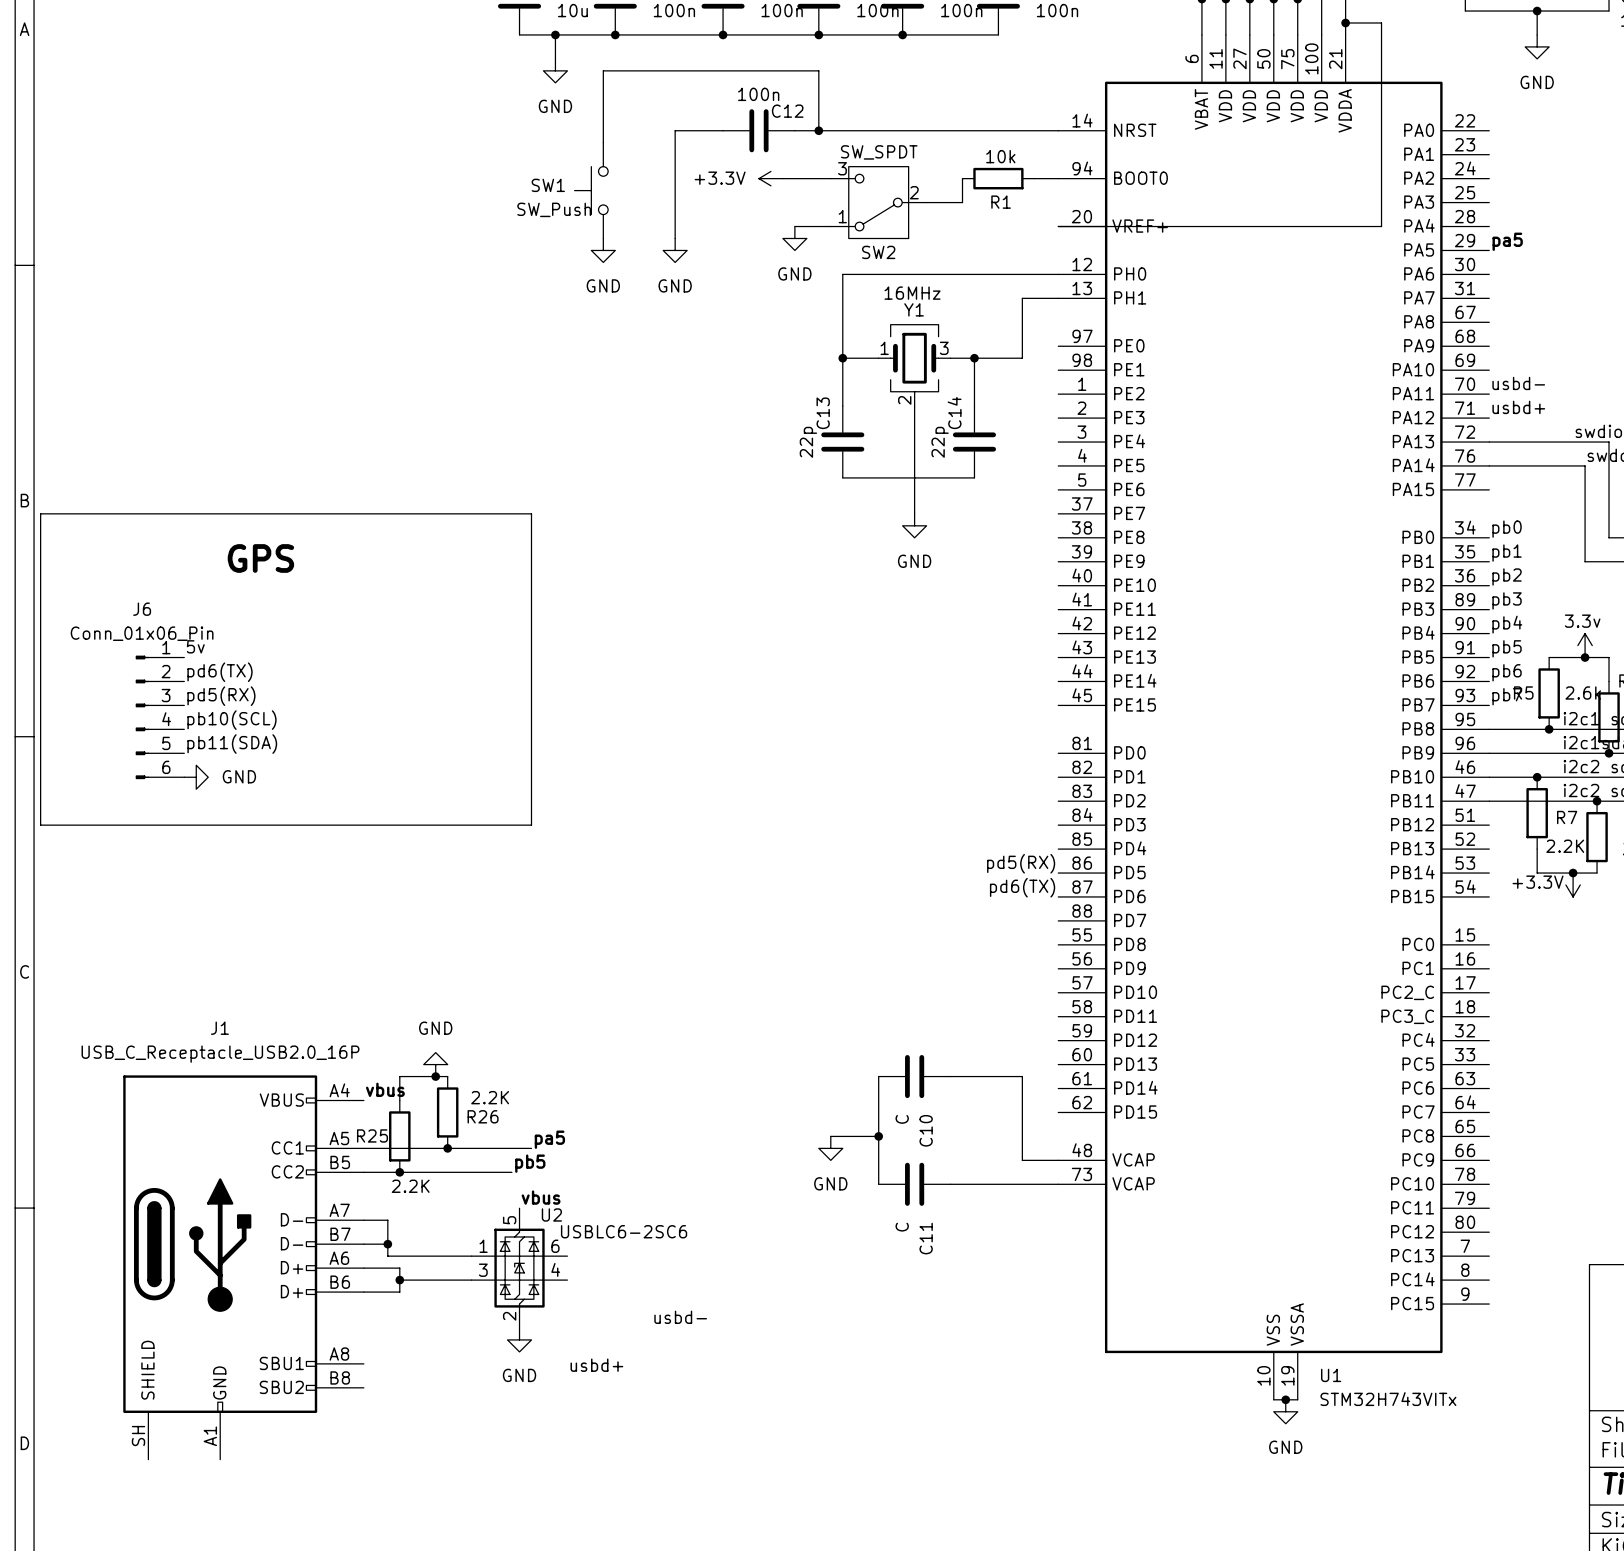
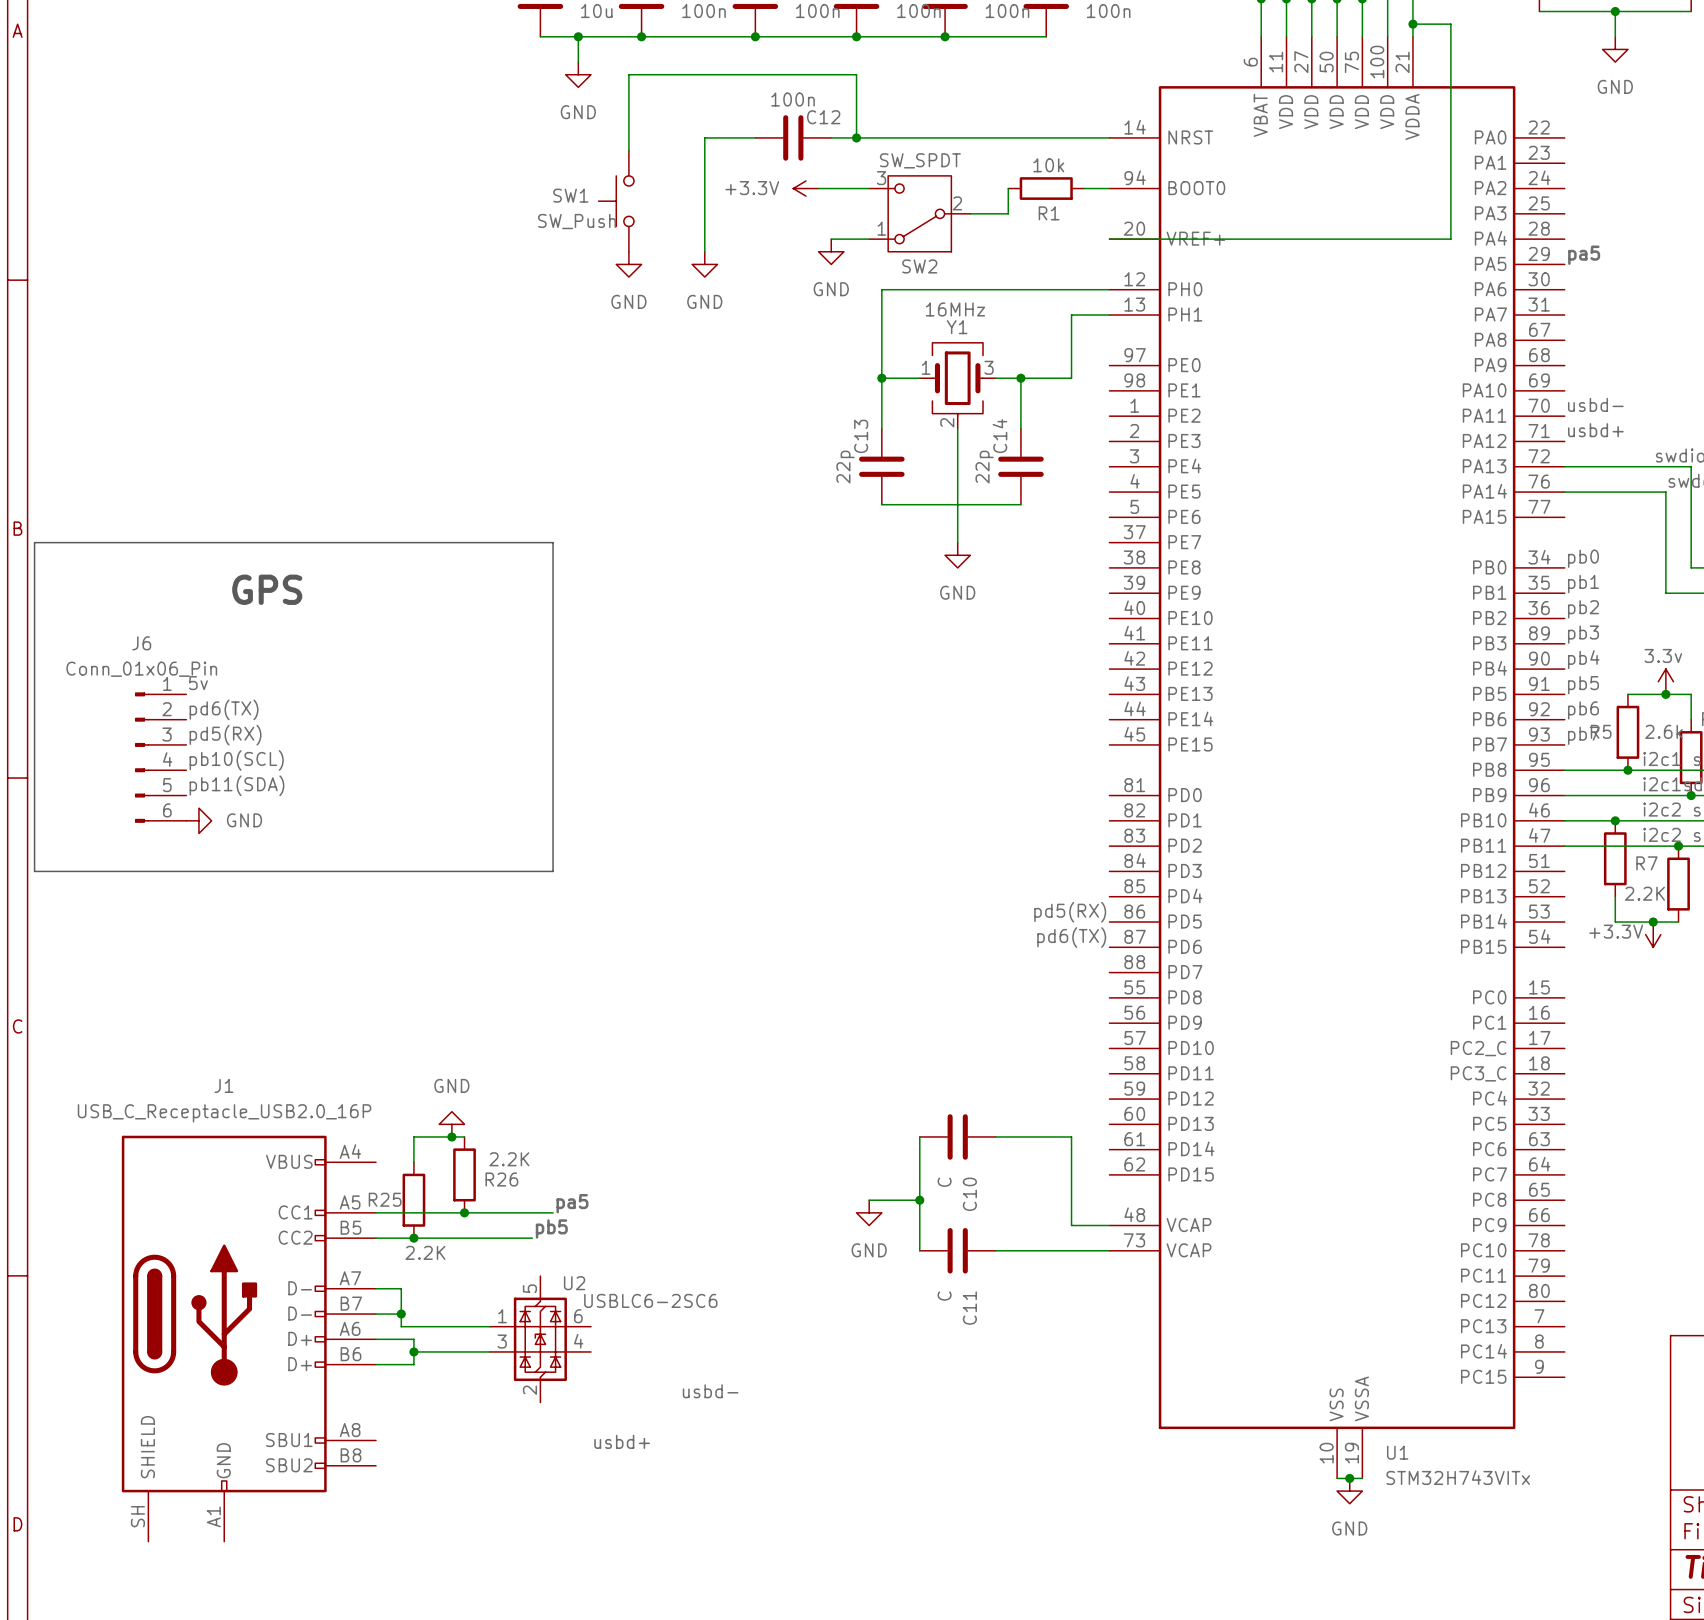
label: vbus (385, 1089) -> none
label: vbus (541, 1197) -> none
power symbol: GND (519, 1339) -> none

